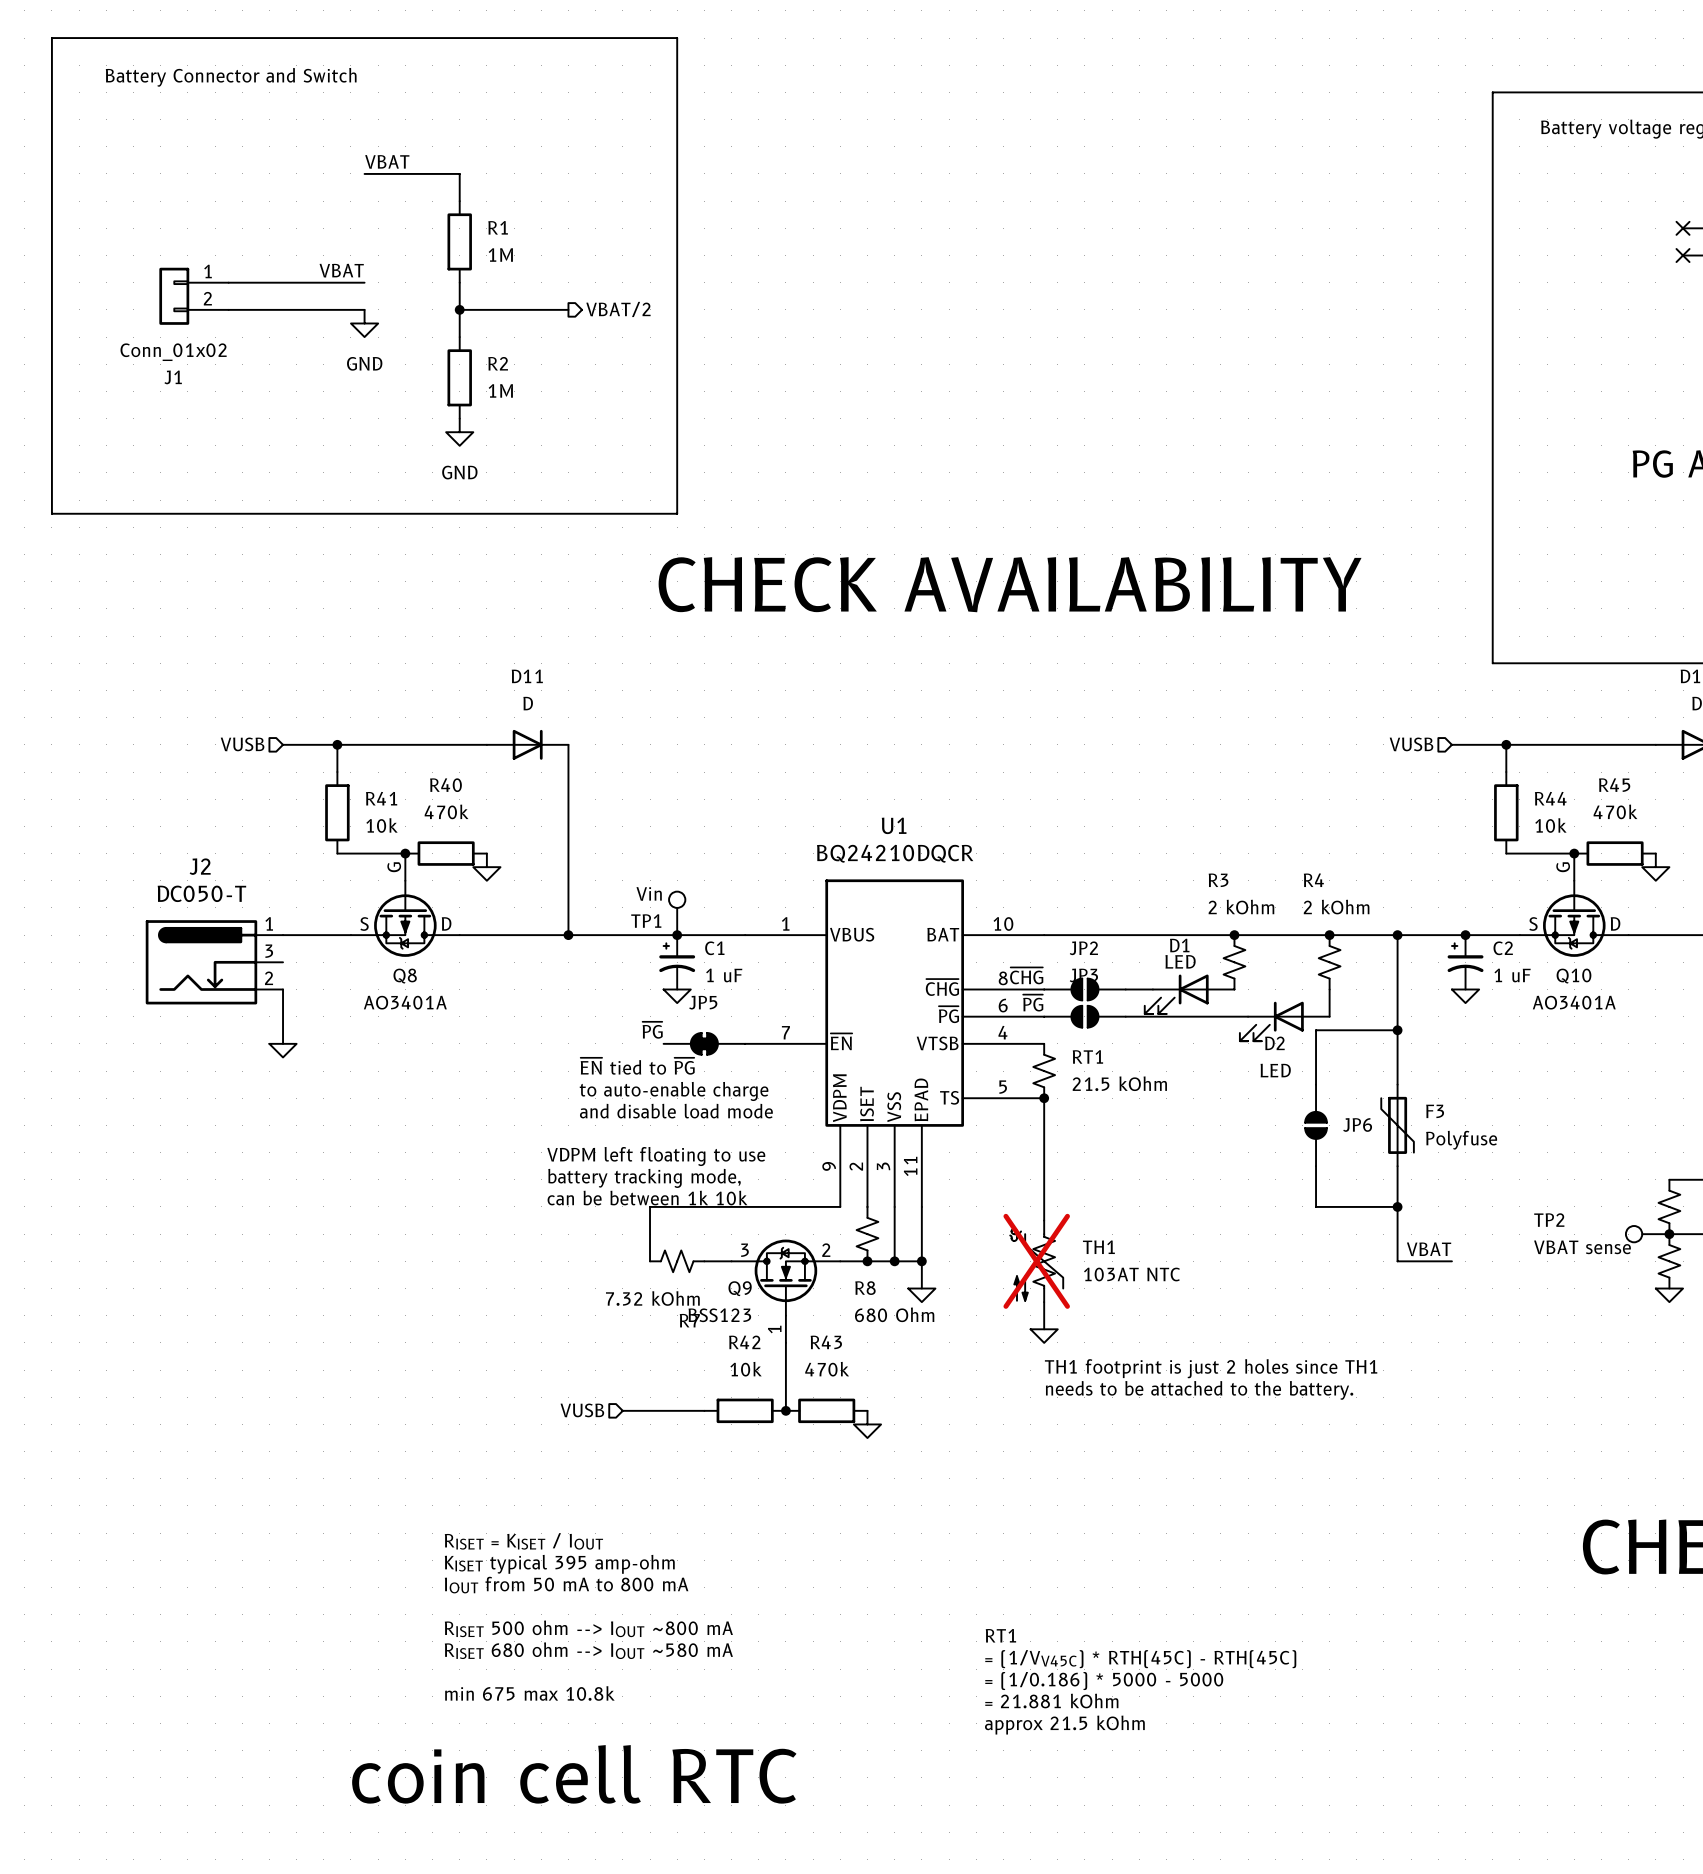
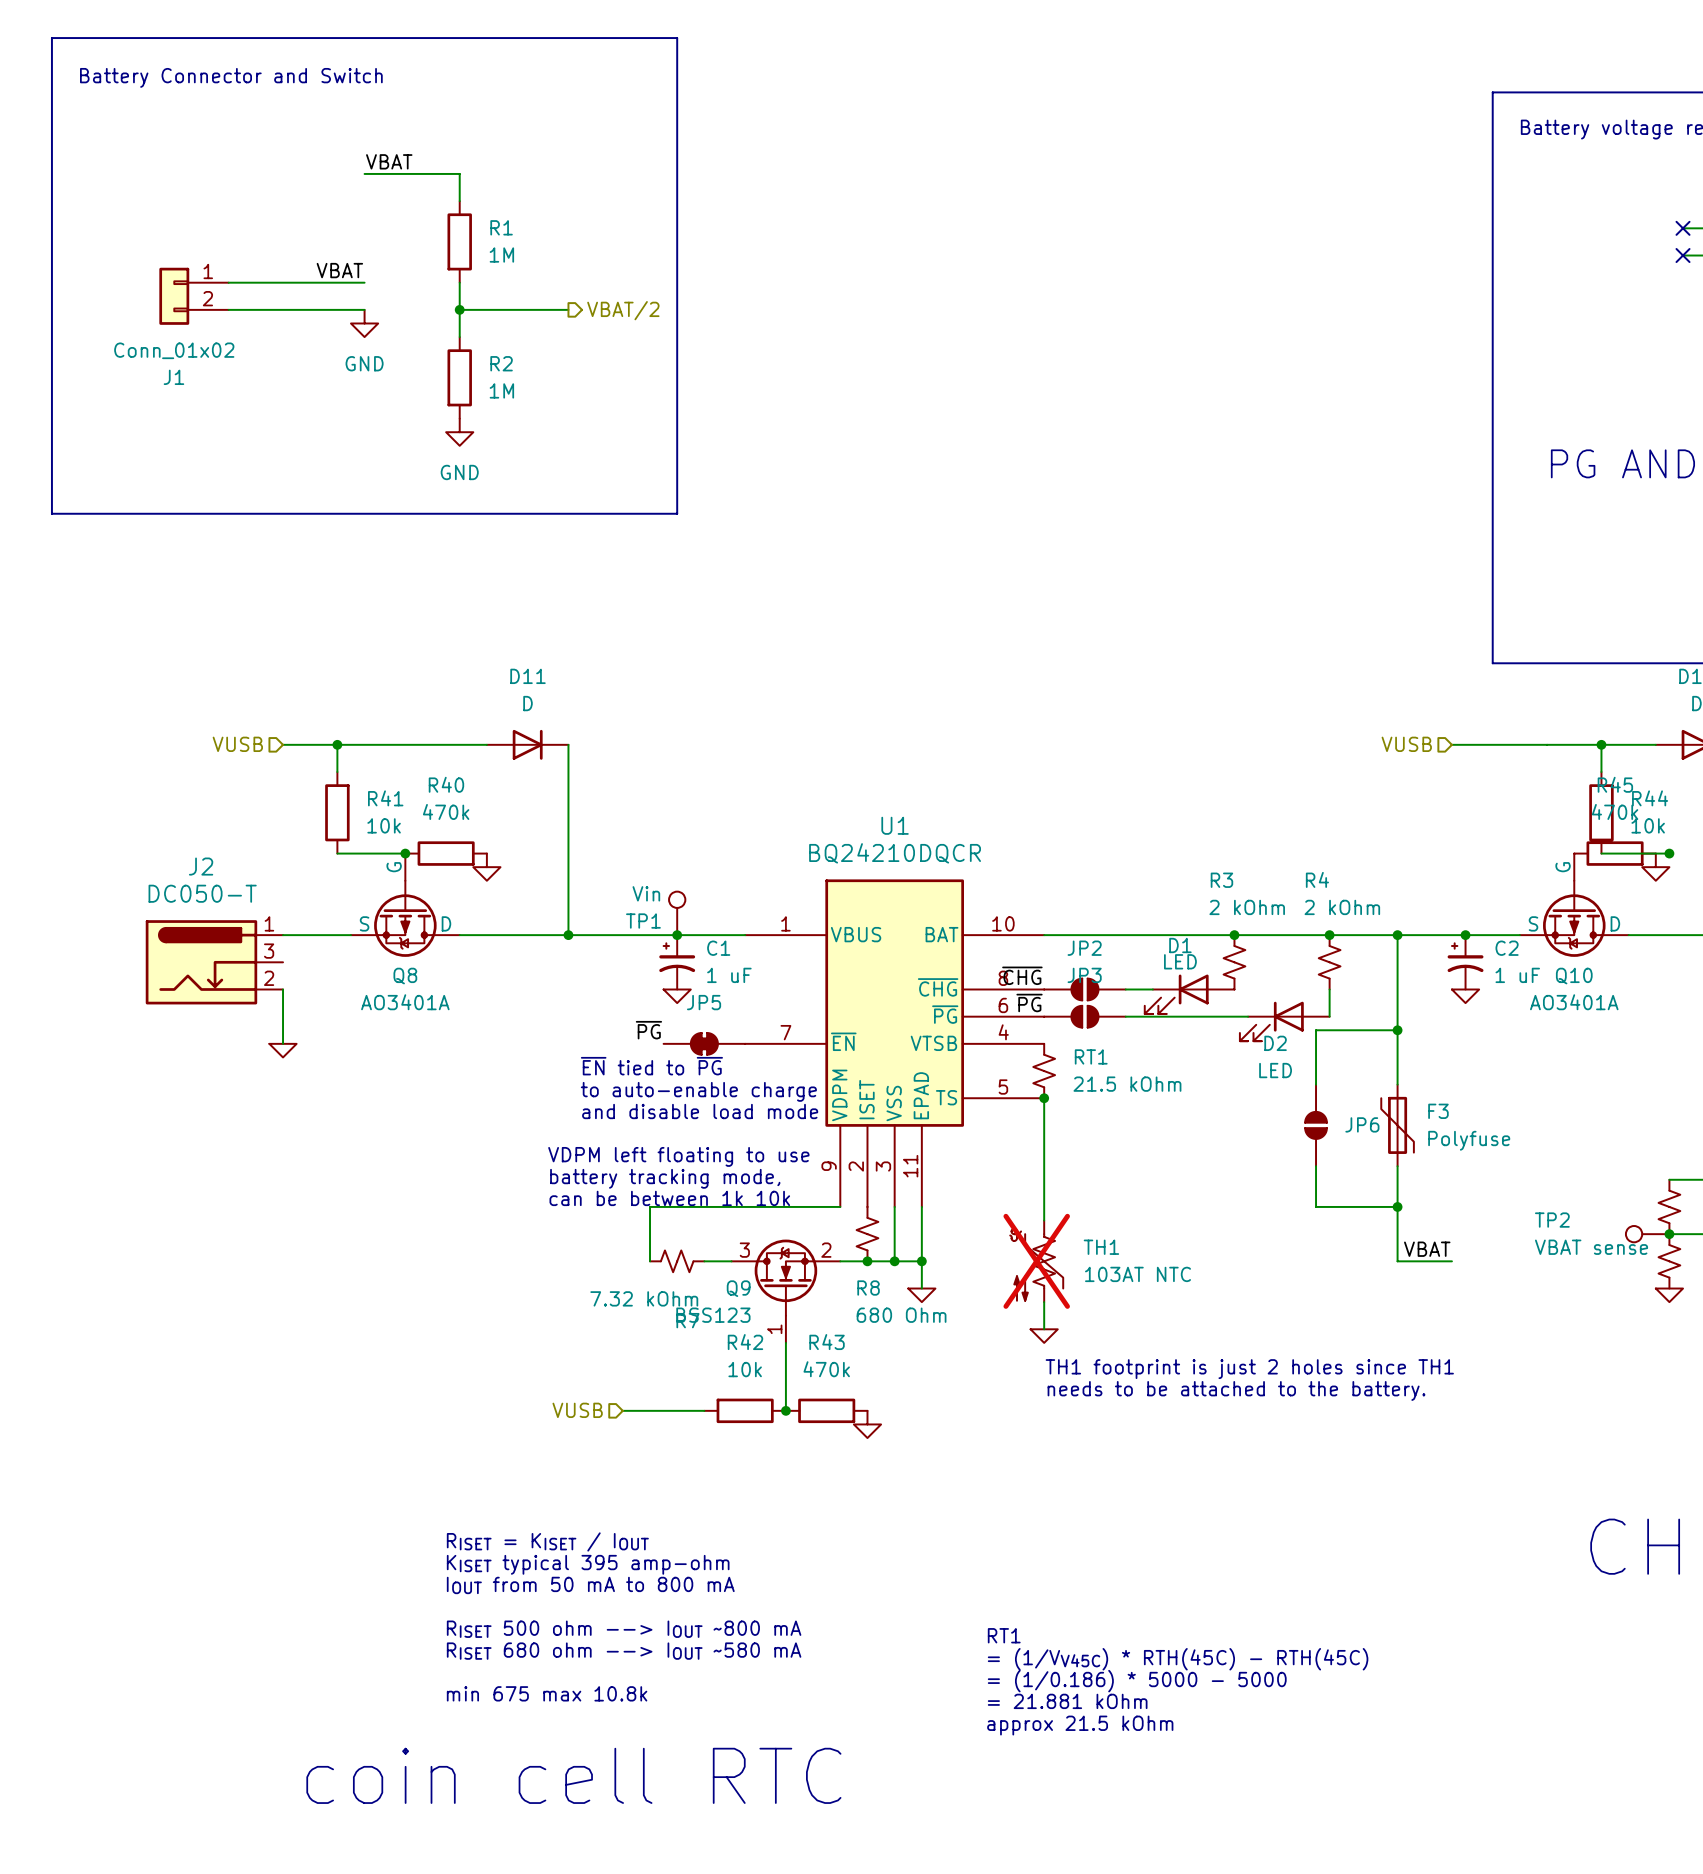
text: CHECK AVAILABILITY (1010, 584) -> none
wire: (1506, 744) (1506, 772) -> (1601, 744) (1601, 772)
junction: (1506, 744) -> none
junction: none -> (1601, 744)
R44 position: (1506, 812) -> (1601, 812)
wire: (1506, 853) (1574, 853) -> (1601, 853) (1669, 853)
junction: (1574, 853) -> none
junction: none -> (1669, 853)

